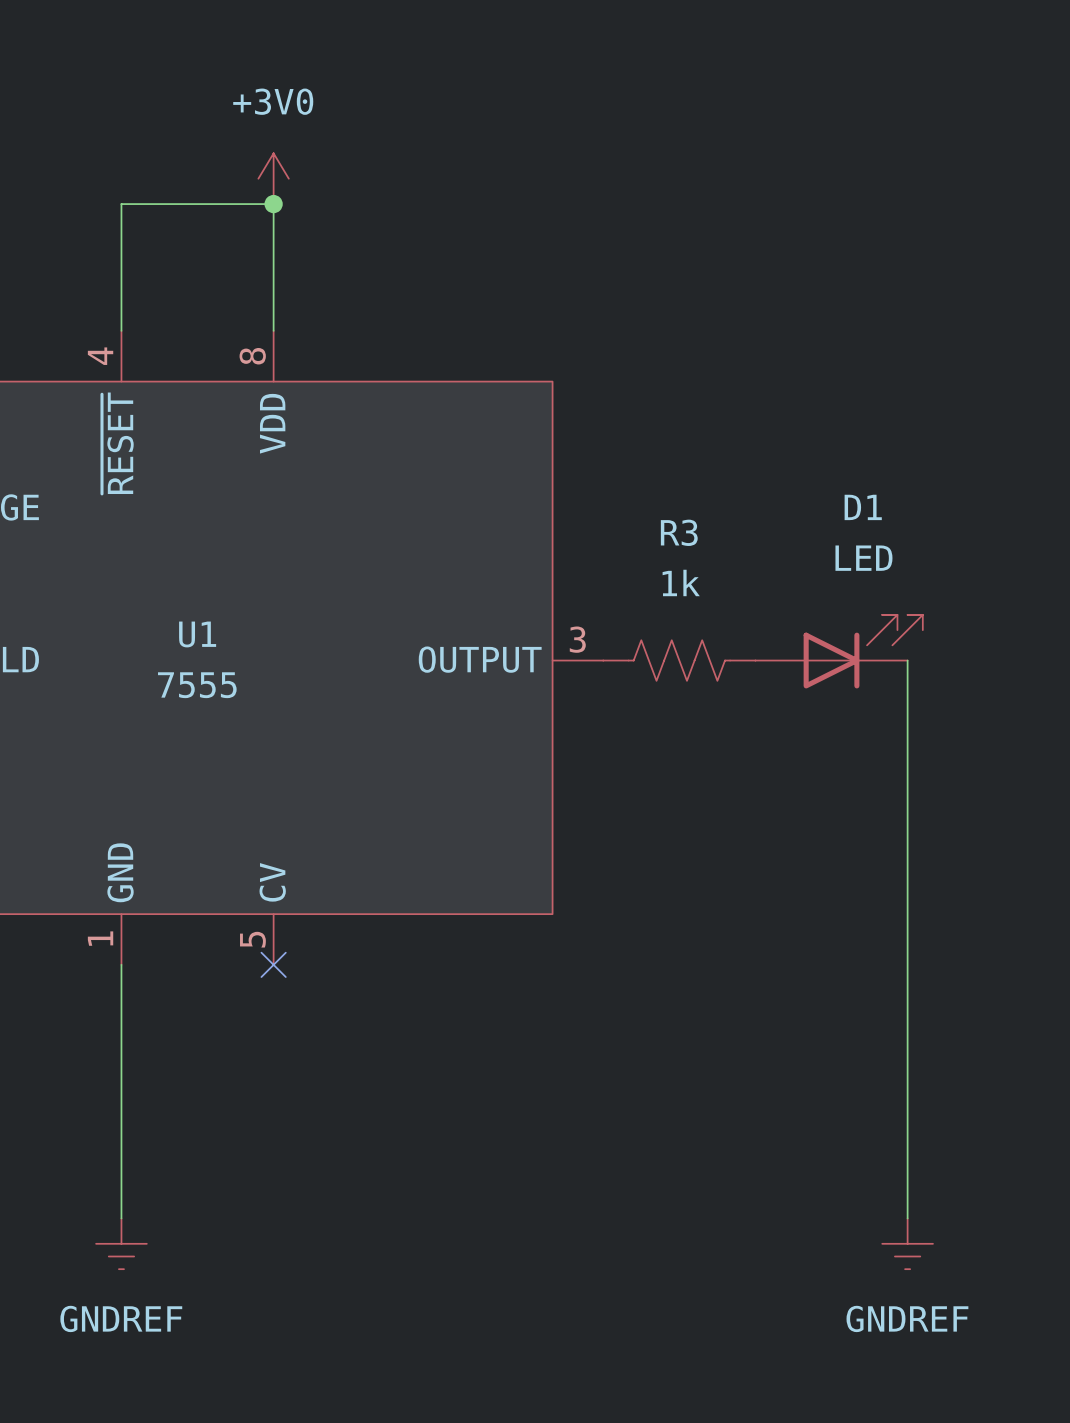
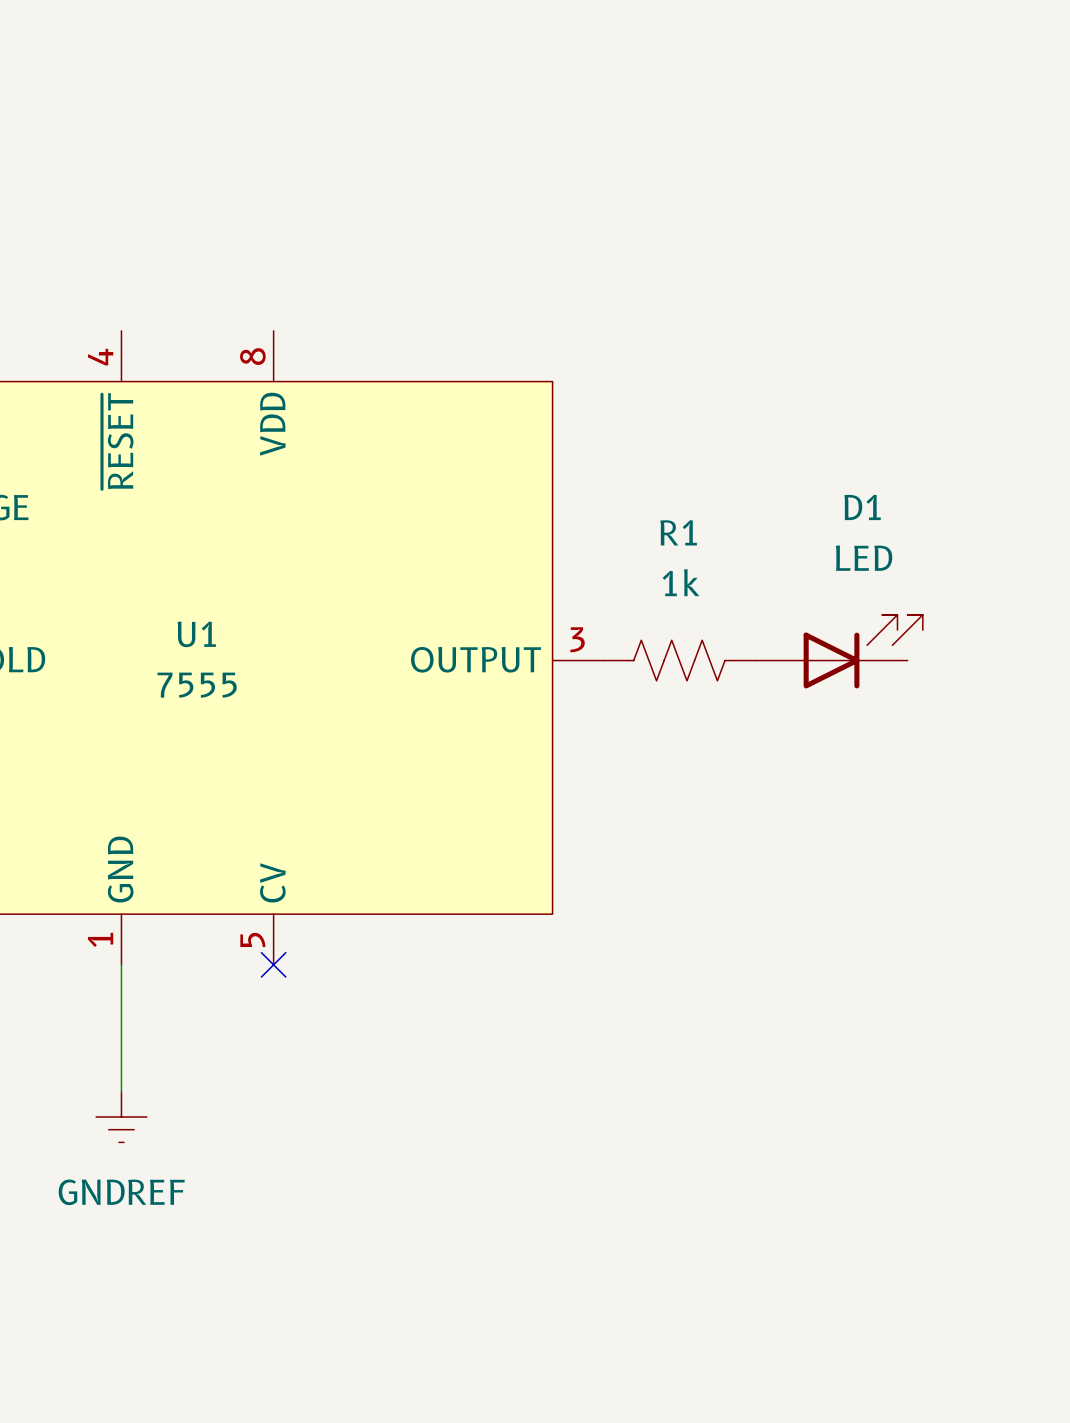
power symbol: +3V0 (273, 178) -> none
junction: (273, 204) -> none
wire: (121, 330) (121, 204) (273, 204) (273, 330) -> none
R3 name: R3 (679, 532) -> R1 (678, 532)
wire: (907, 660) (907, 1218) -> none
wire: (121, 1091) (121, 1218) -> none
power symbol position: GNDREF (121, 1243) -> GNDREF (121, 1117)
power symbol: GNDREF (907, 1243) -> none

